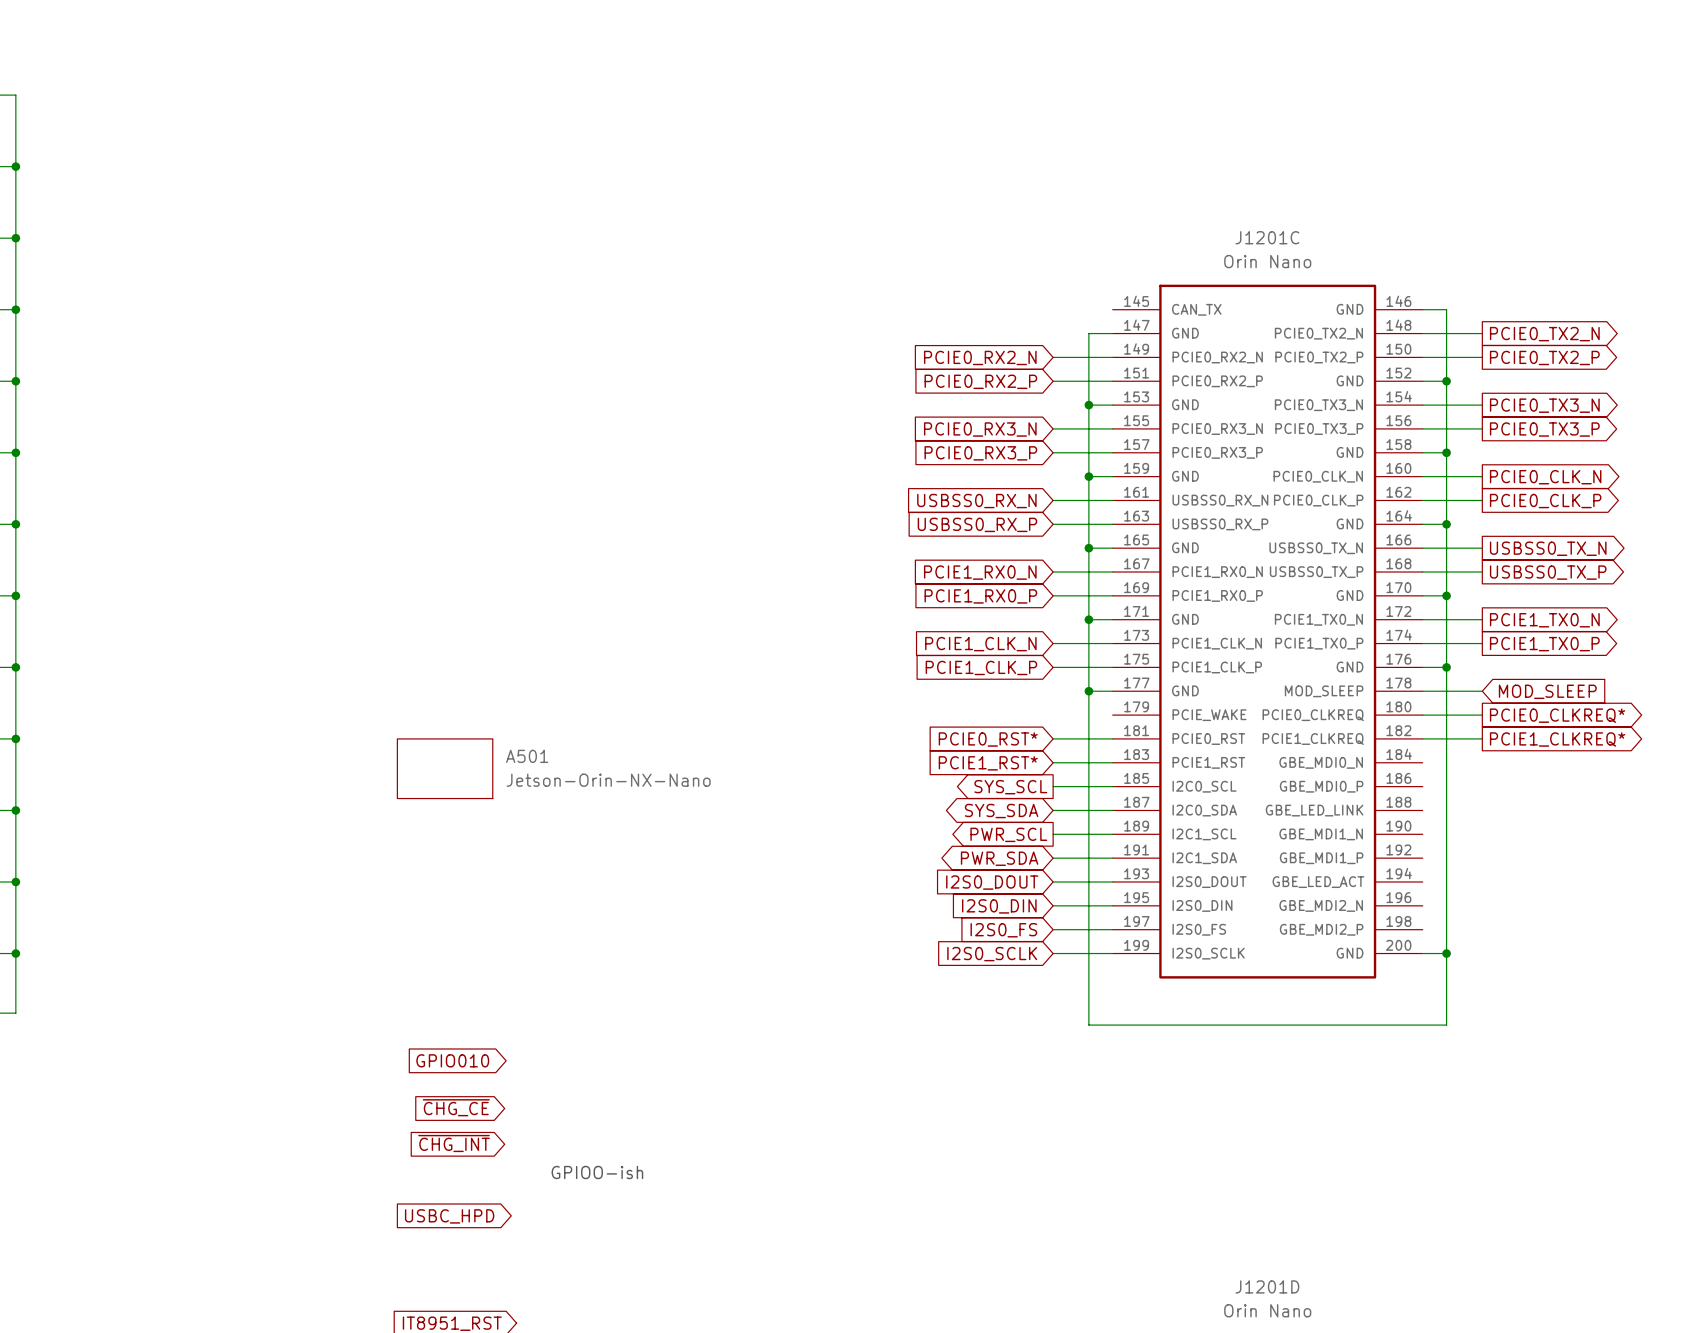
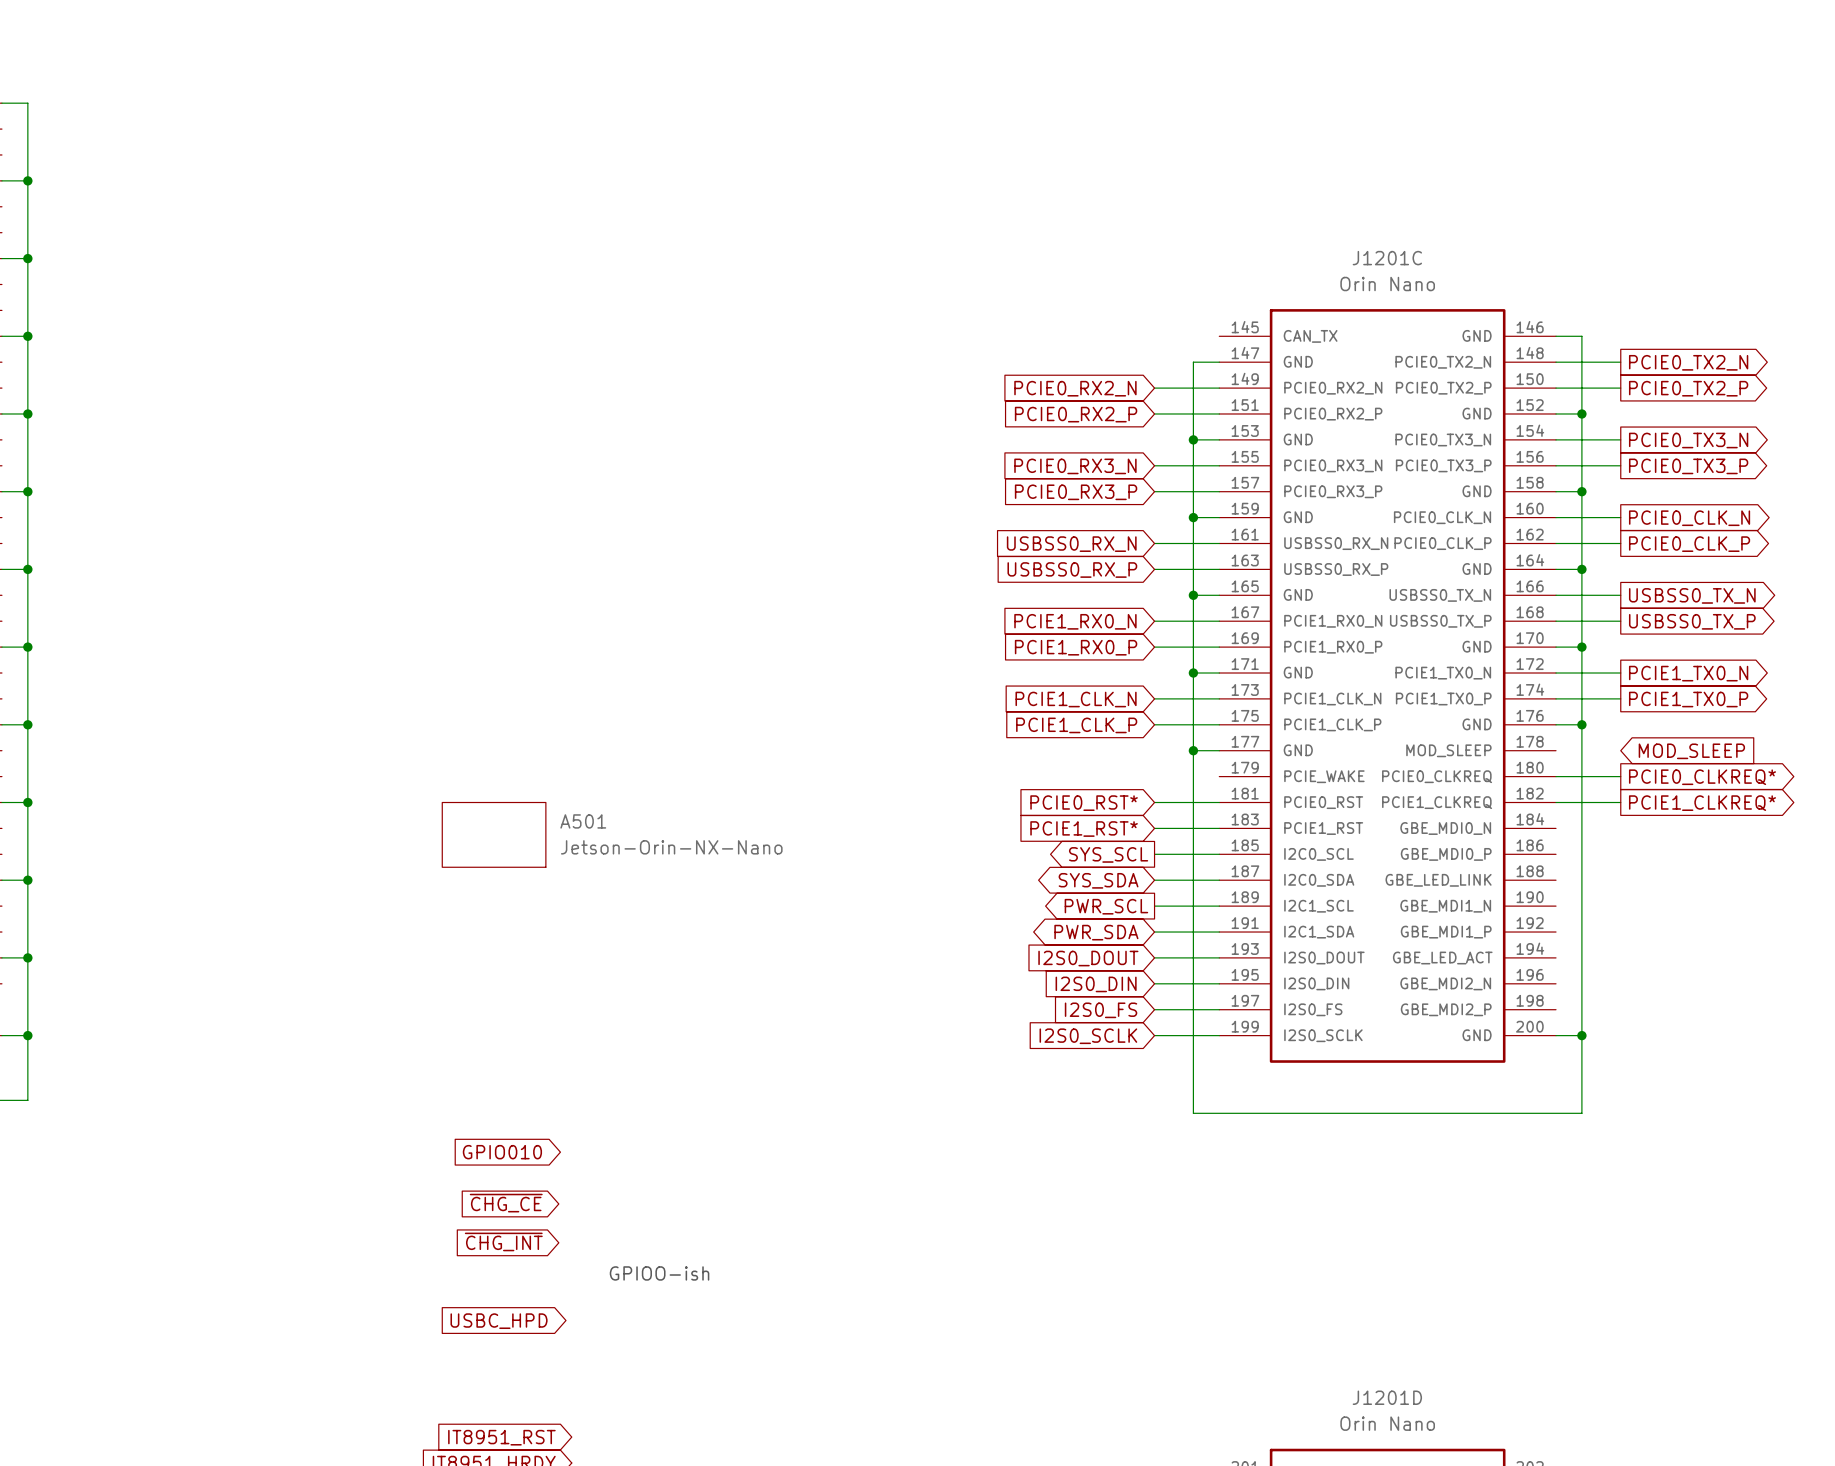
wire: (1422, 691) (1482, 691) -> none

